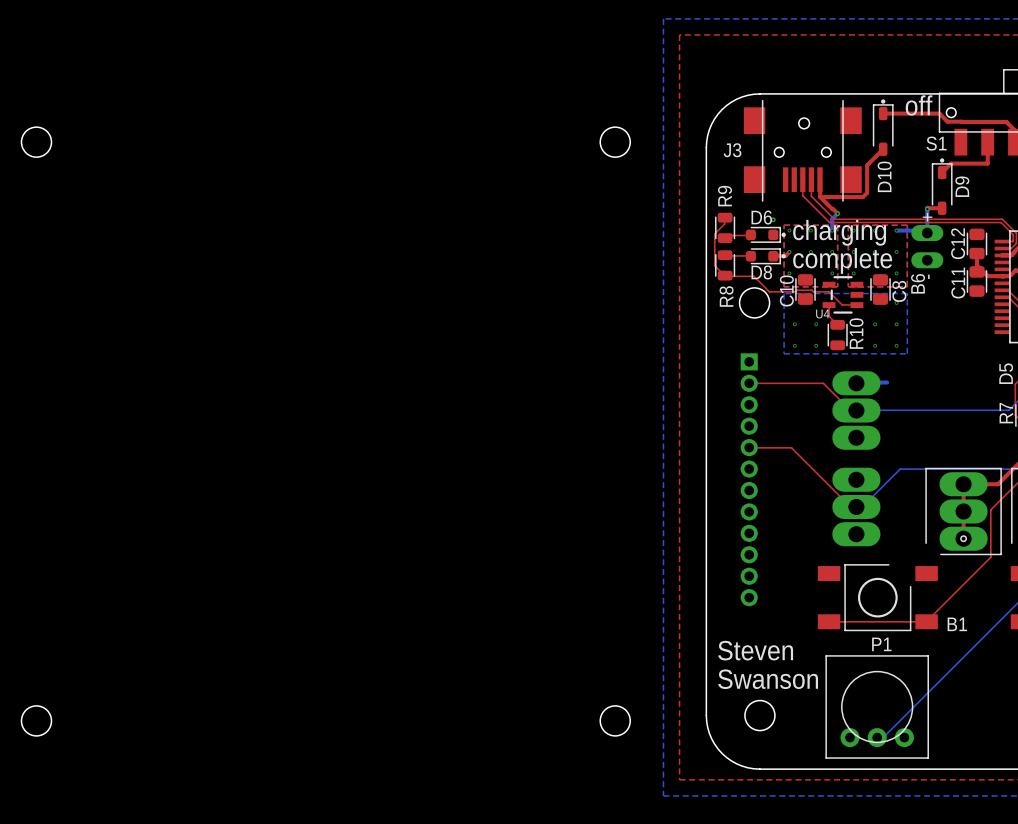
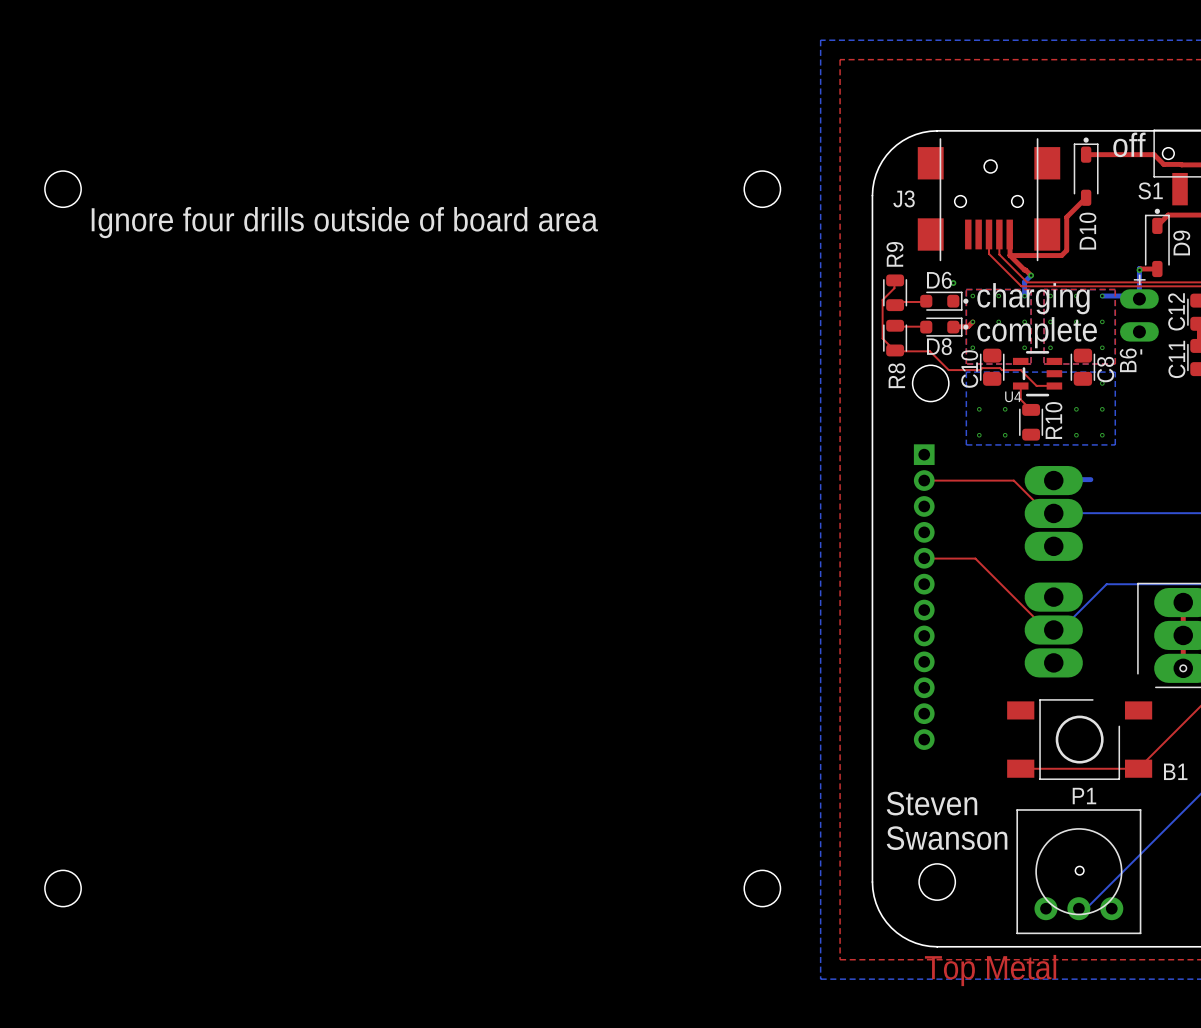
text: none -> Ignore four drills outside of board area (344, 222)
part: none -> (1079, 870)
text: none -> Top Metal (990, 970)

